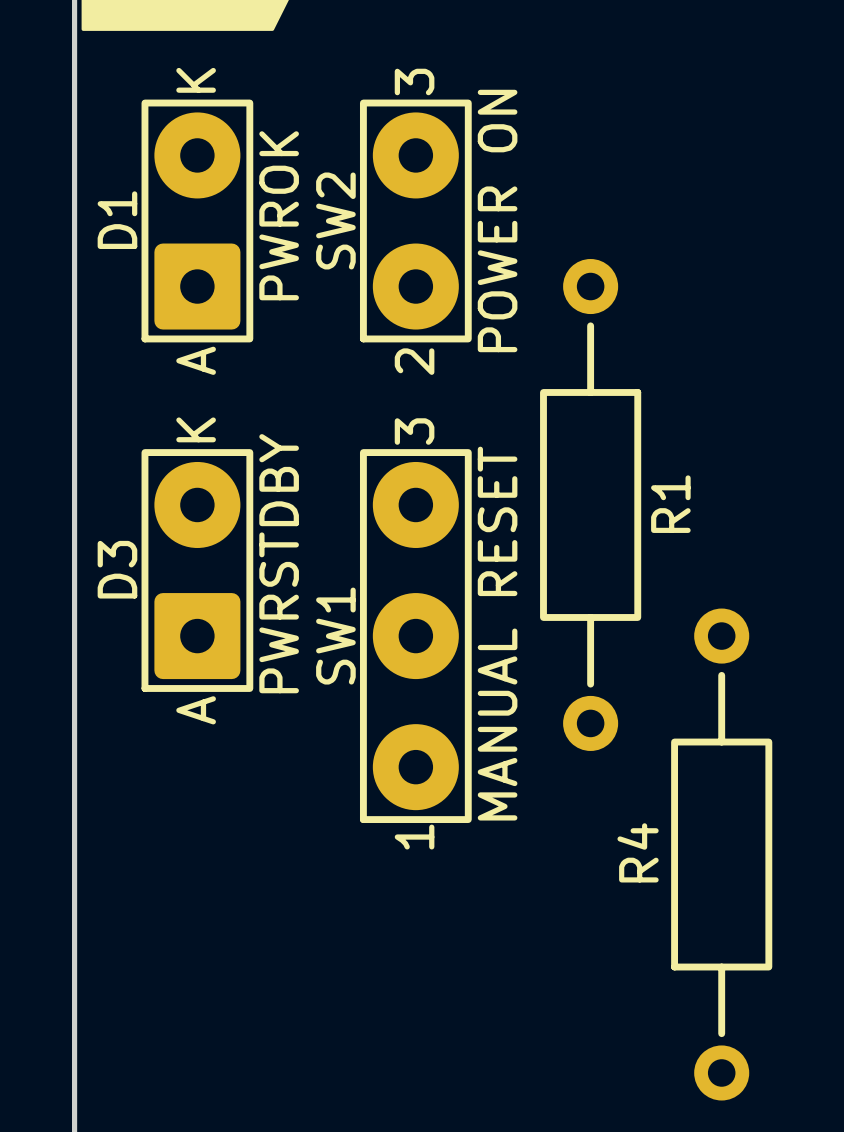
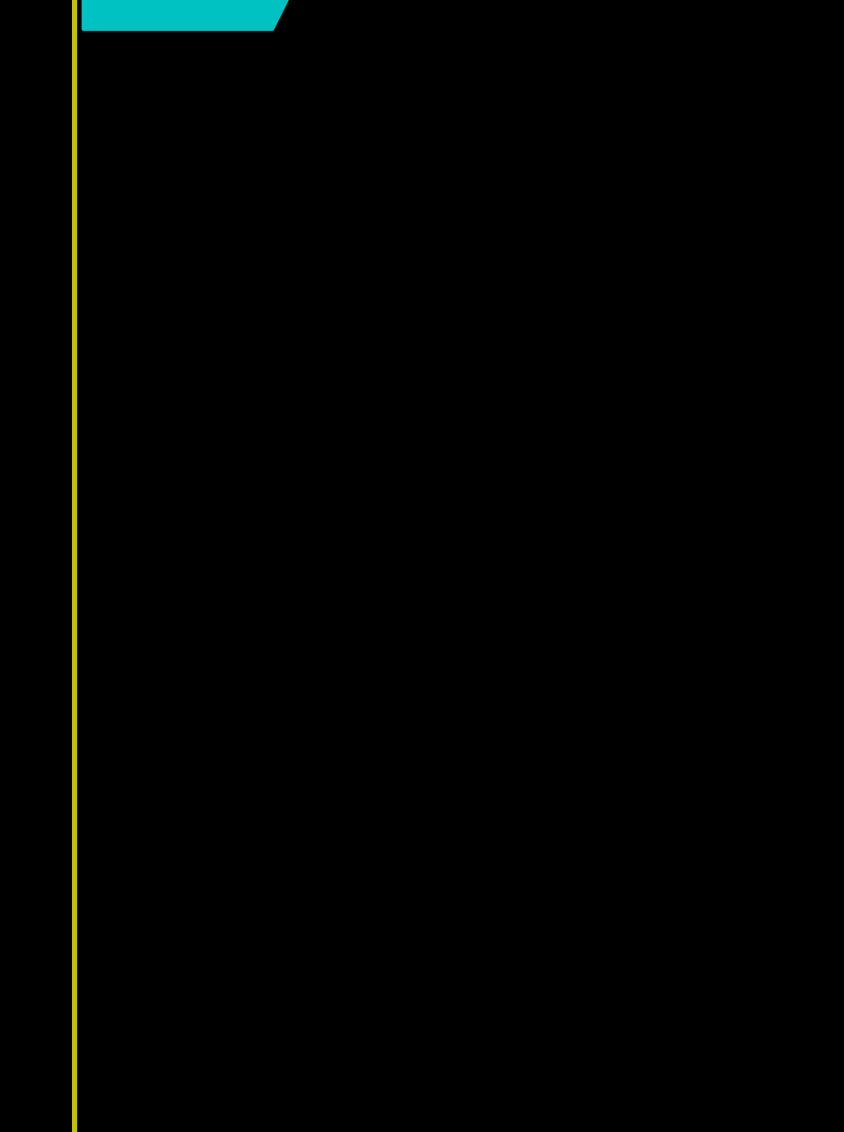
D1: (197, 220) -> none
SW2: (415, 220) -> none
R1: (590, 504) -> none
D3: (197, 570) -> none
SW1: (415, 636) -> none
R4: (721, 854) -> none

